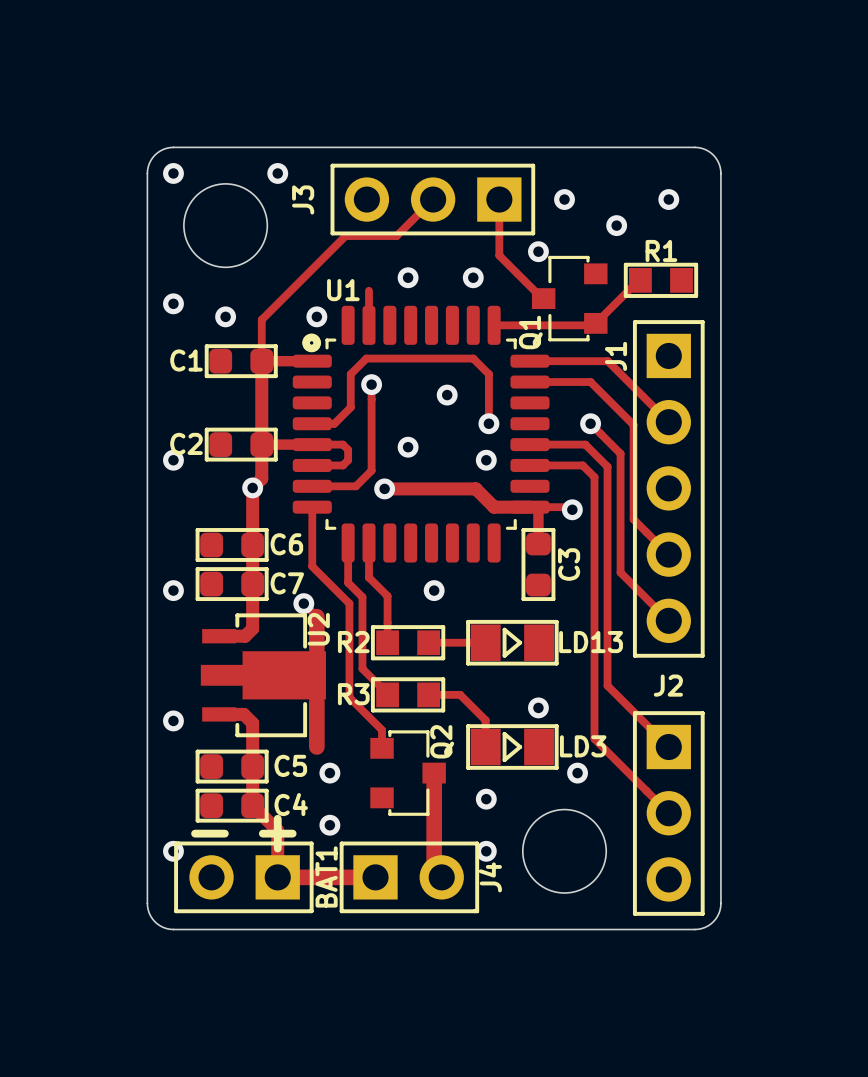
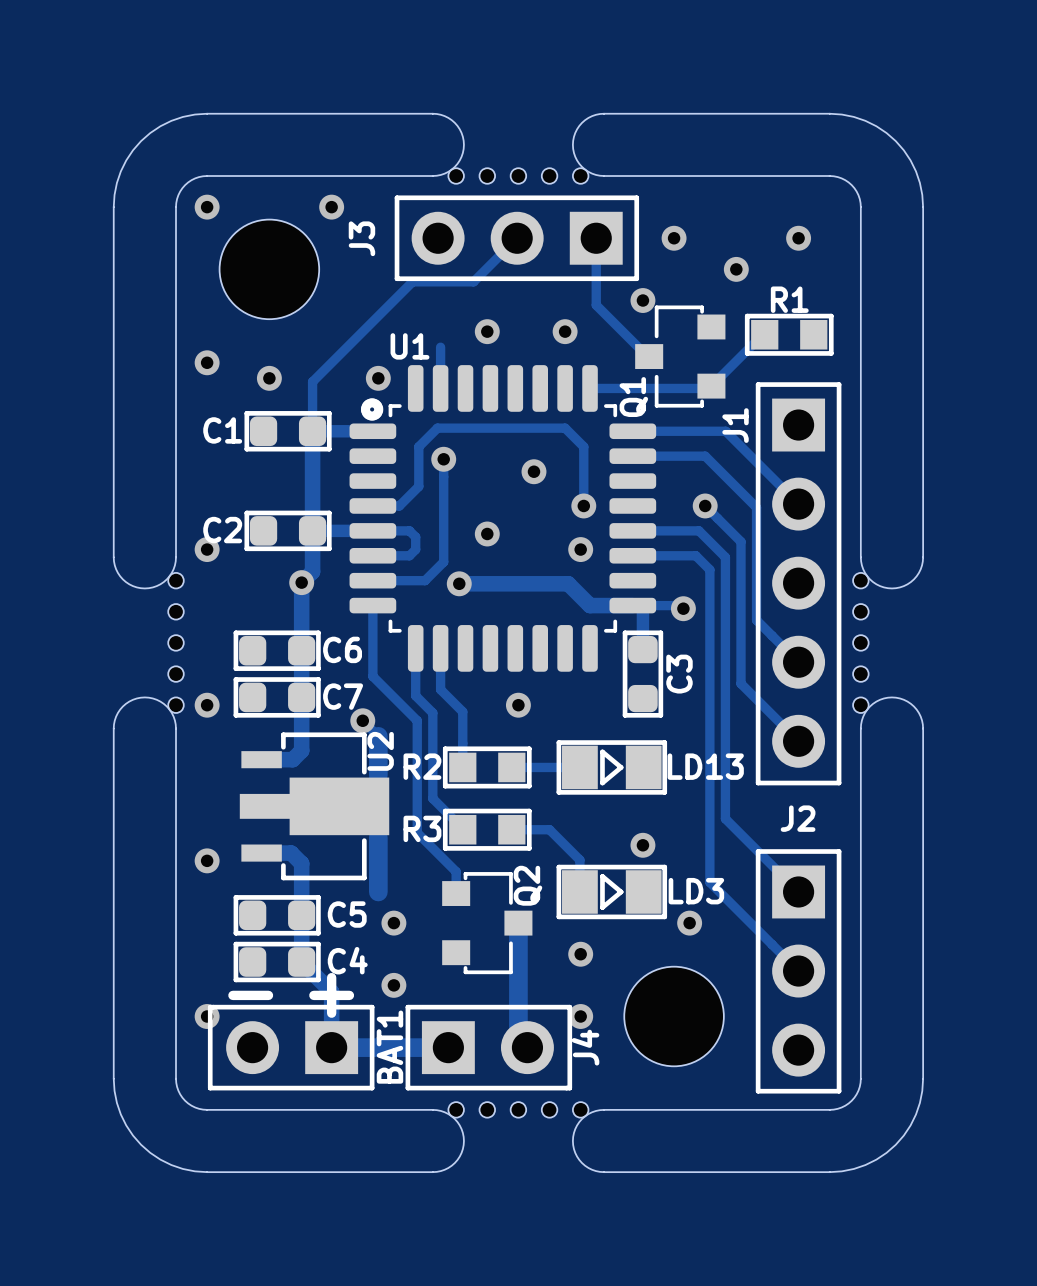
board edge: (362, 147) (505, 147) -> (432, 176) (444, 173) (454, 166) (461, 156) (463, 144) (461, 132) (457, 125) (448, 117) (436, 114) (194, 114) (182, 116) (160, 126) (150, 133) (133, 150) (126, 160) (116, 182) (113, 207) (114, 561) (117, 572) (125, 582) (132, 586) (144, 588) (156, 586) (166, 579) (173, 569) (176, 557)
part: none -> (518, 176)
board edge: (147, 466) (147, 610) -> none
board edge: (720, 466) (720, 610) -> (860, 557) (863, 569) (869, 579) (880, 586) (891, 588) (903, 586) (910, 582) (918, 572) (922, 561) (923, 207) (919, 182) (910, 160) (903, 150) (886, 133) (876, 126) (853, 116) (841, 114) (599, 114) (588, 117) (579, 125) (575, 132) (572, 144) (575, 156) (582, 166) (592, 173) (604, 176)
part: none -> (176, 642)
part: none -> (860, 642)
board edge: none -> (860, 728) (863, 716) (869, 706) (880, 699) (891, 697) (903, 699) (910, 703) (918, 712) (922, 724) (923, 1078) (919, 1102) (910, 1125) (903, 1135) (886, 1152) (876, 1159) (853, 1168) (841, 1171) (599, 1171) (588, 1167) (579, 1159) (575, 1152) (572, 1141) (575, 1129) (582, 1119) (592, 1112) (604, 1109)
board edge: (362, 929) (505, 929) -> (432, 1109) (444, 1112) (454, 1119) (461, 1129) (463, 1141) (461, 1152) (457, 1159) (448, 1167) (436, 1171) (194, 1171) (182, 1168) (160, 1159) (150, 1152) (133, 1135) (126, 1125) (116, 1102) (113, 1078) (114, 724) (117, 712) (125, 703) (132, 699) (144, 697) (156, 699) (166, 706) (173, 716) (176, 728)
part: none -> (518, 1109)

